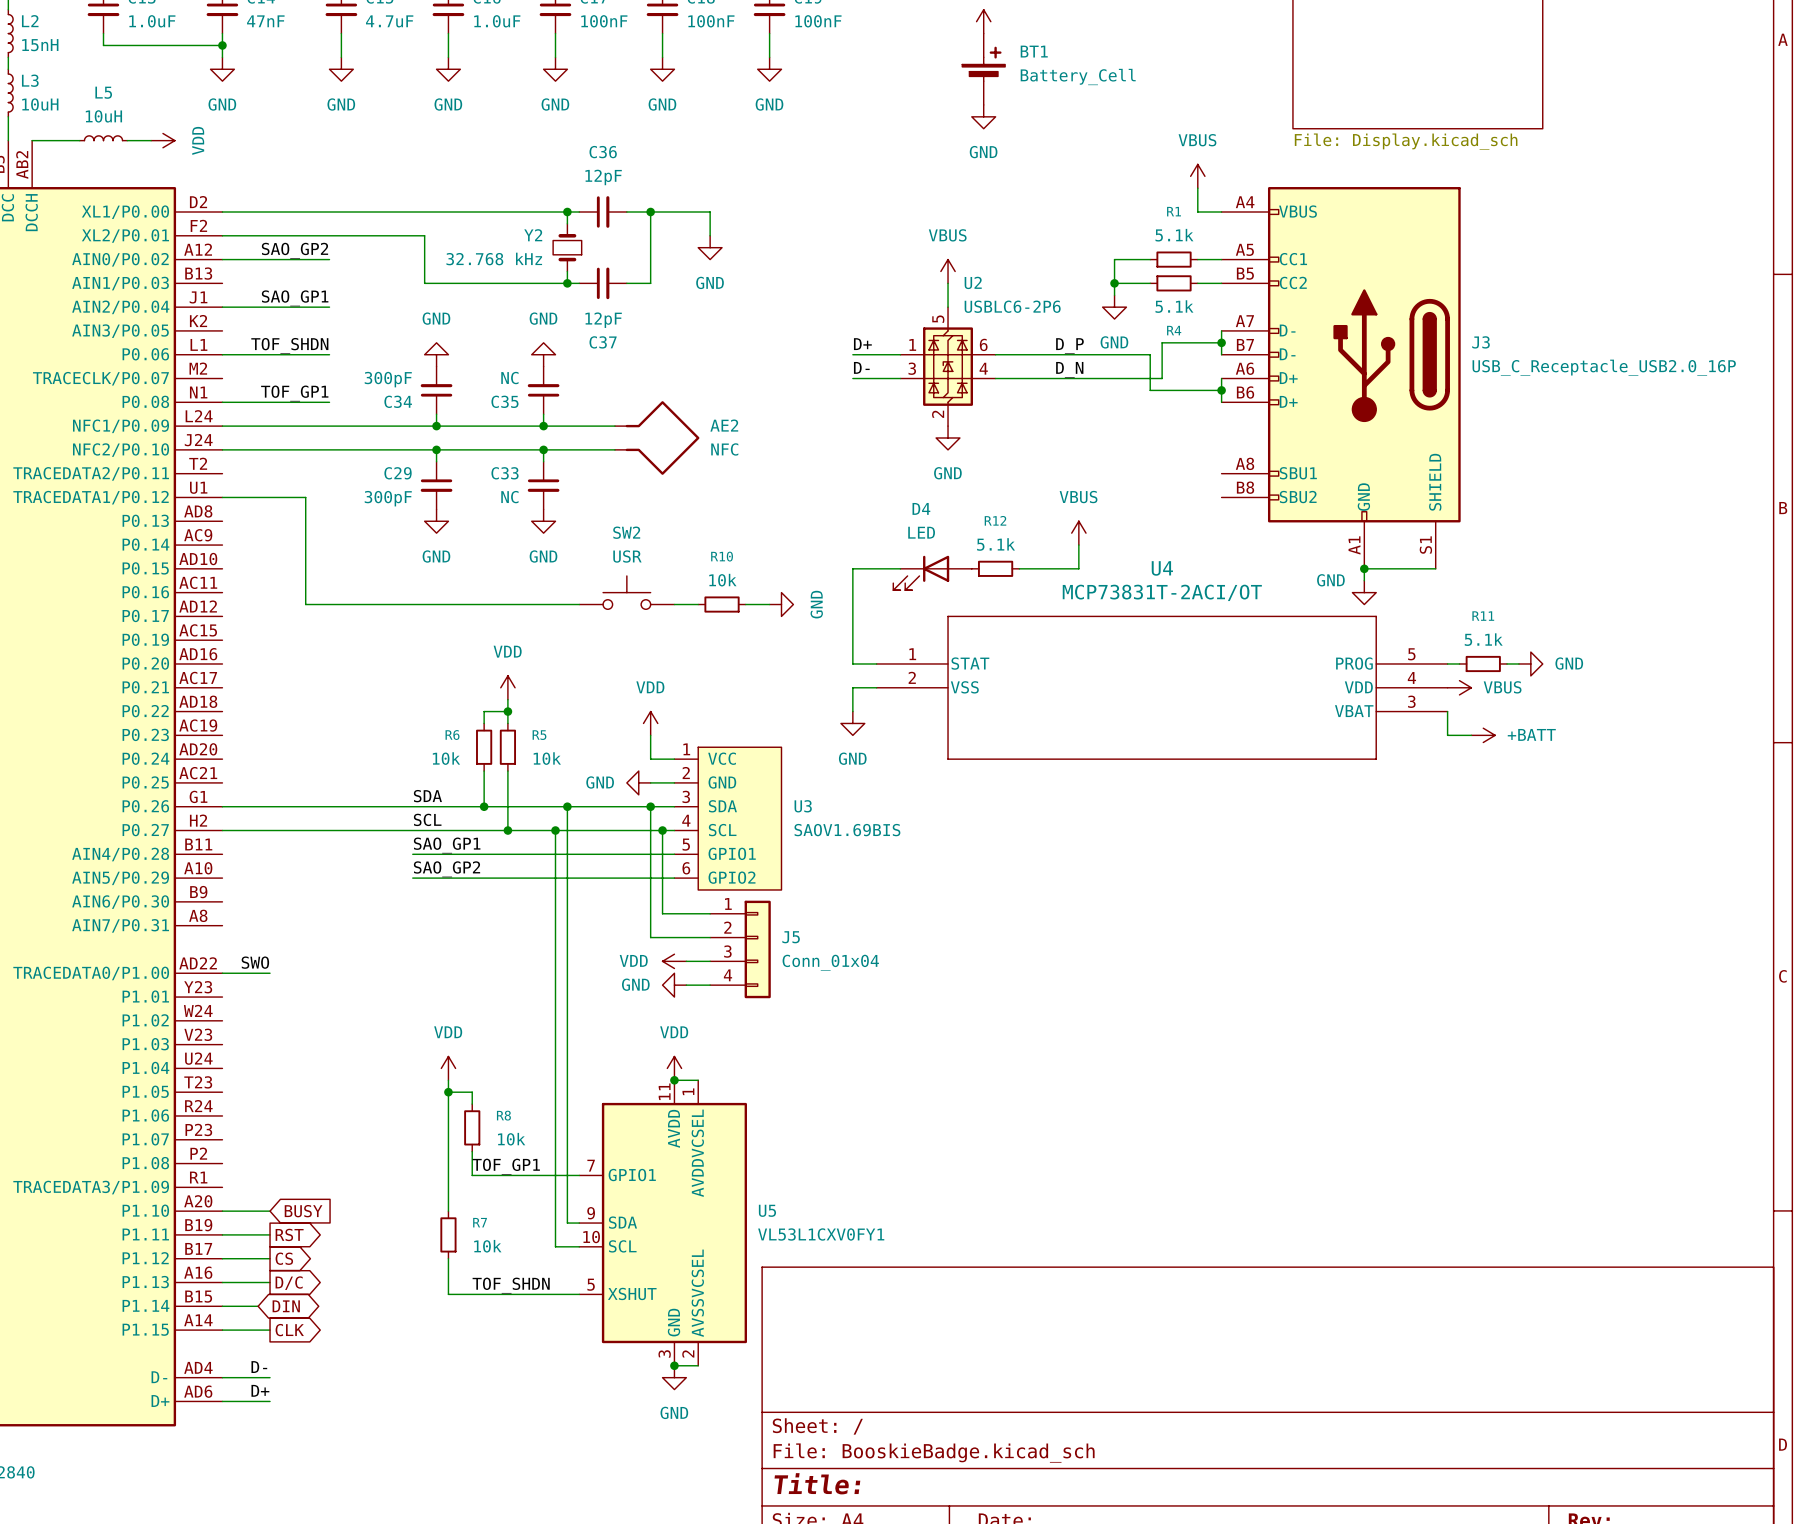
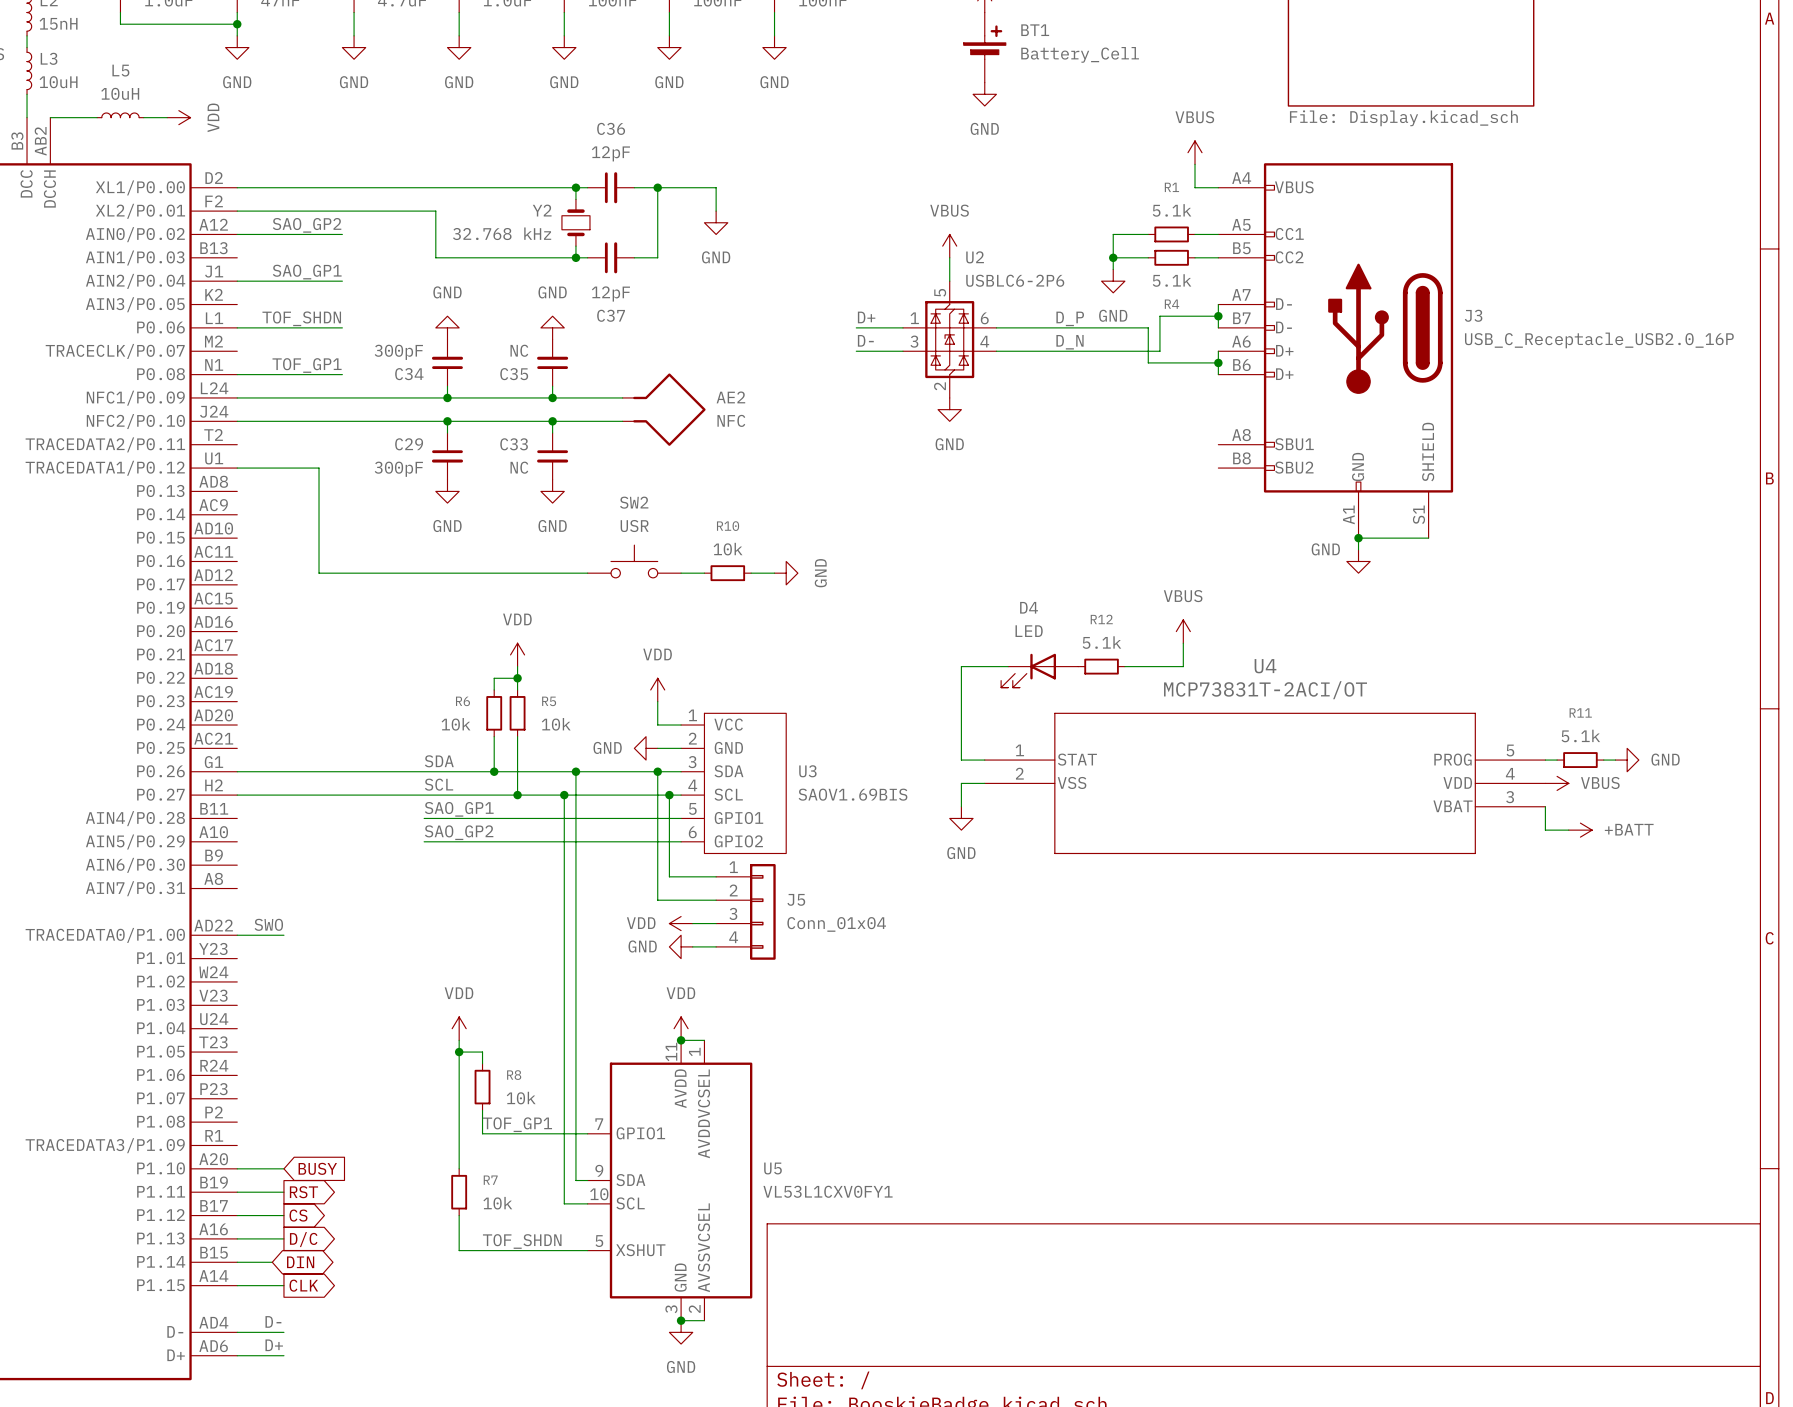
power symbol: VBUS (1078, 533) -> none
wire: (1078, 545) (1078, 568) (1019, 568) -> (1183, 643) (1183, 666) (1124, 666)
wire: (900, 568) (852, 568) (852, 663) (876, 663) -> (1008, 666) (961, 666) (961, 760) (984, 760)
R12 position: (995, 568) -> (1101, 666)
D4 position: (932, 572) -> (1039, 670)
power symbol: none -> VBUS (1183, 631)
wire: (1447, 663) (1459, 663) -> (1545, 760) (1557, 760)
R11 position: (1483, 663) -> (1580, 760)
wire: (1507, 663) (1518, 663) -> (1603, 760) (1615, 760)
power symbol position: GND (1530, 663) -> GND (1627, 760)
wire: (876, 687) (852, 687) (852, 711) -> (984, 783) (961, 783) (961, 806)
U4 position: (1162, 687) -> (1265, 783)
power symbol: VBUS (1459, 687) -> none
wire: (1447, 711) (1447, 735) (1471, 735) -> (1545, 806) (1545, 830) (1568, 830)
power symbol position: GND (852, 723) -> GND (961, 818)
power symbol position: +BATT (1483, 735) -> +BATT (1580, 830)
power symbol: none -> VBUS (1557, 783)

